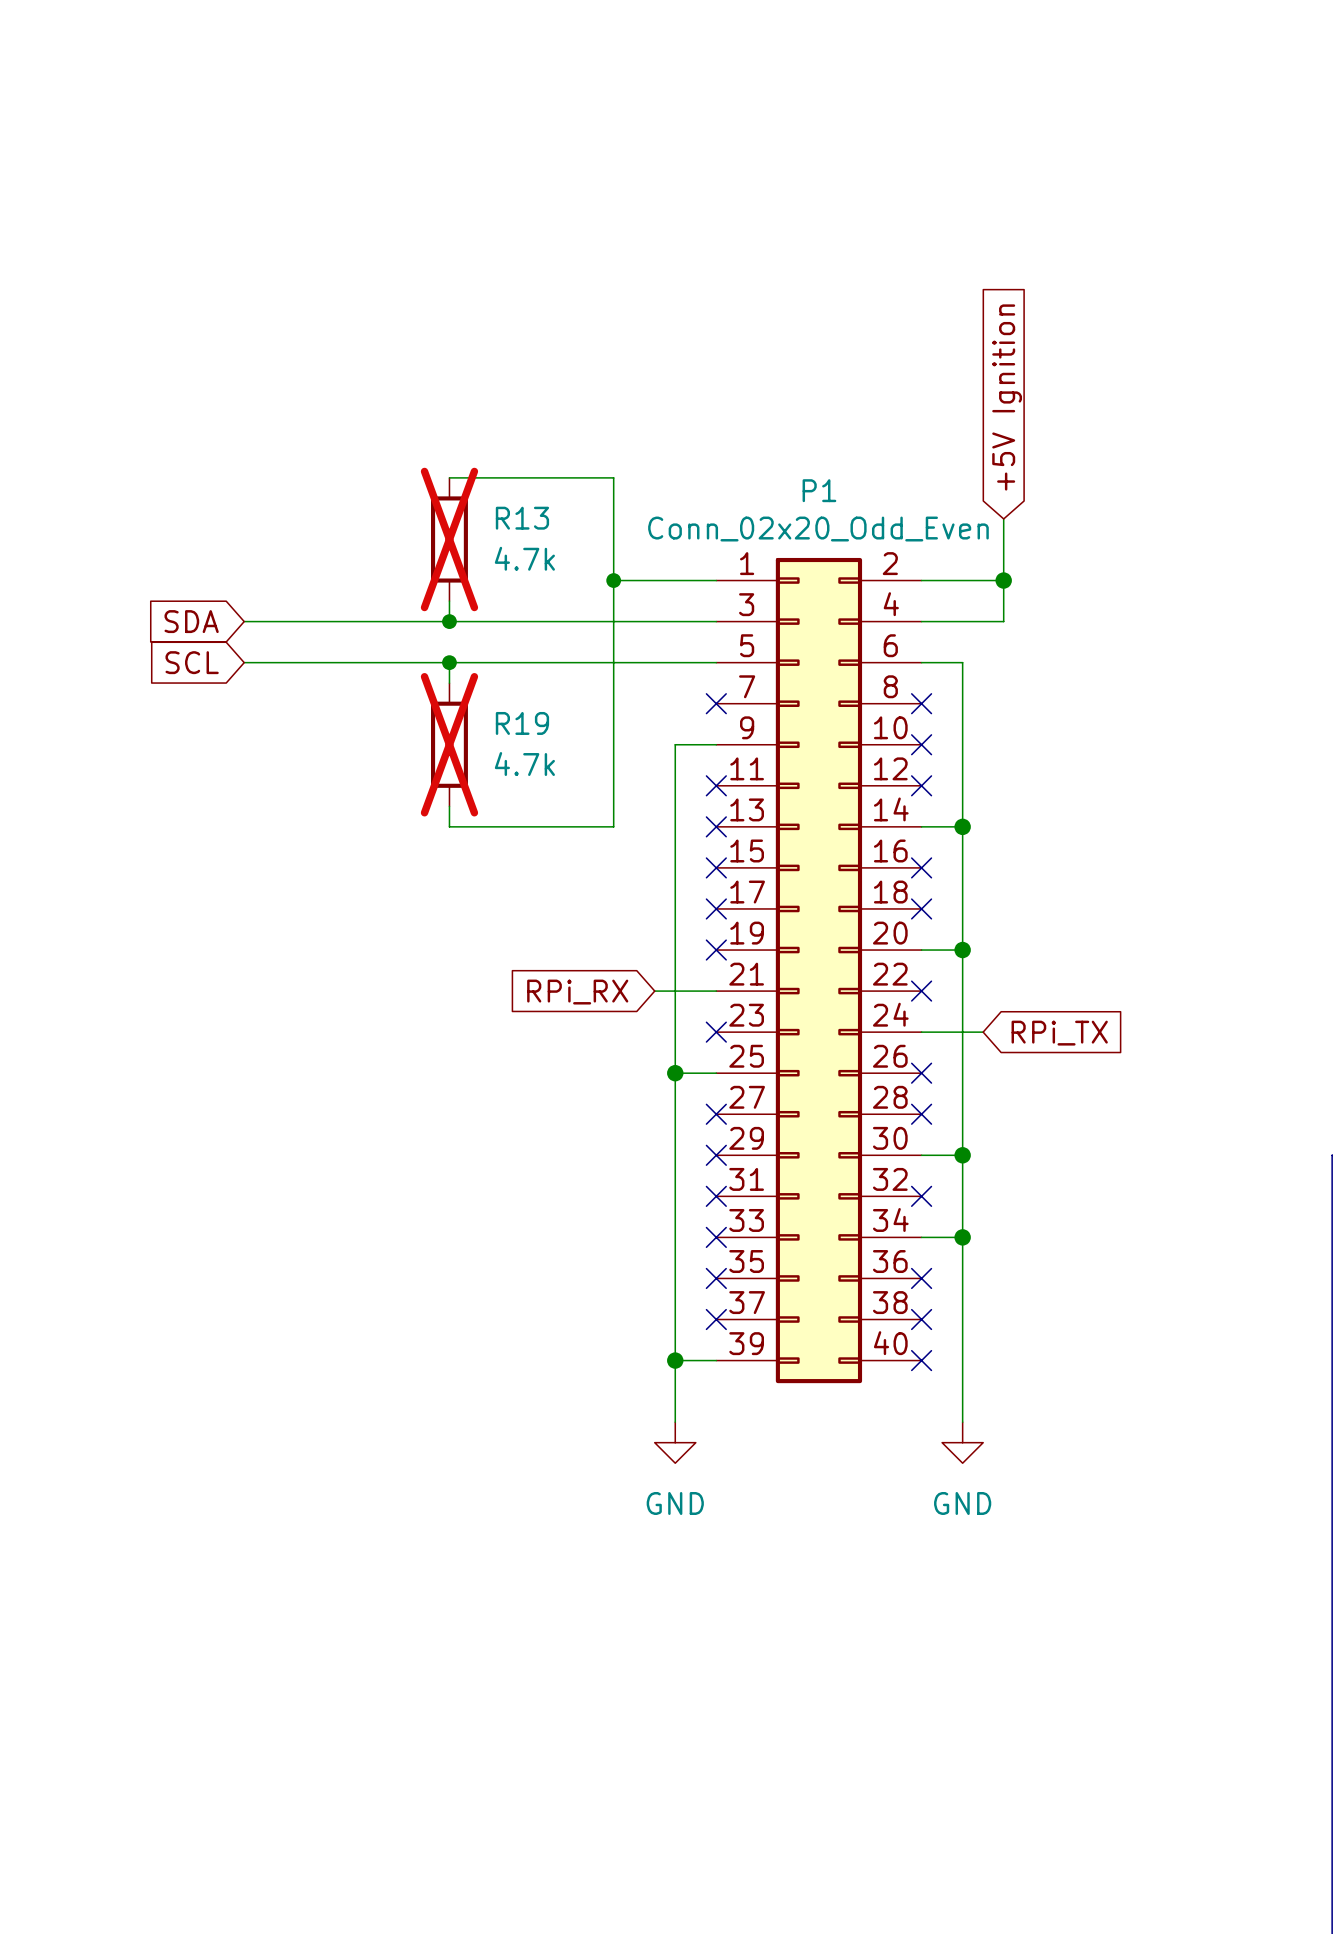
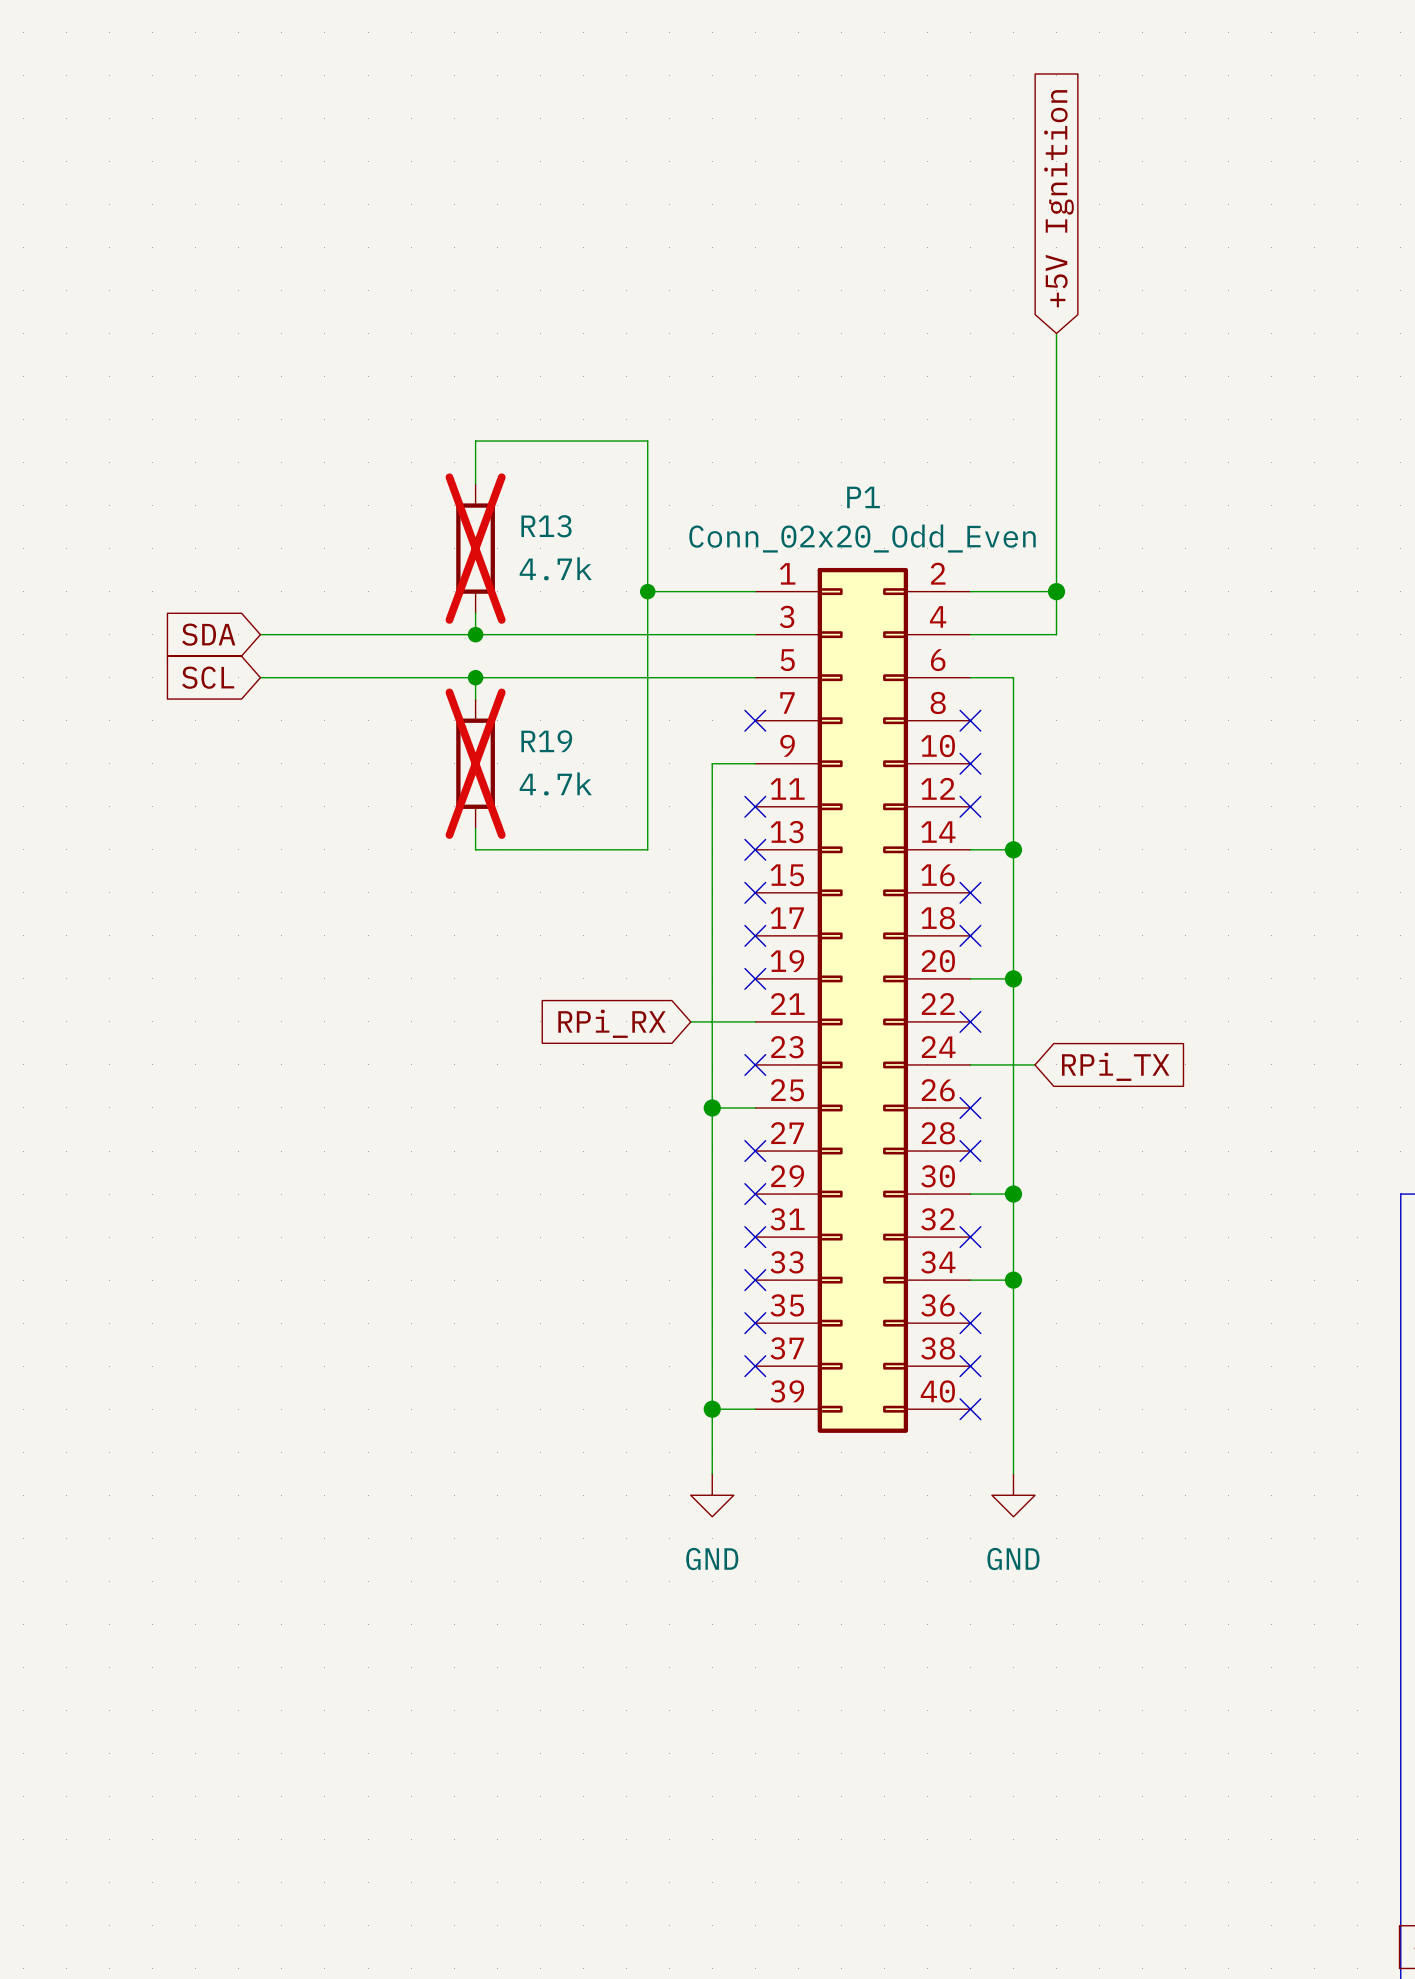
wire: none -> (1056, 333) (1056, 527)
global label position: +5V Ignition (1007, 397) -> +5V Ignition (1059, 198)
wire: (449, 477) (613, 477) -> (475, 484) (475, 441) (647, 441) (647, 484)

